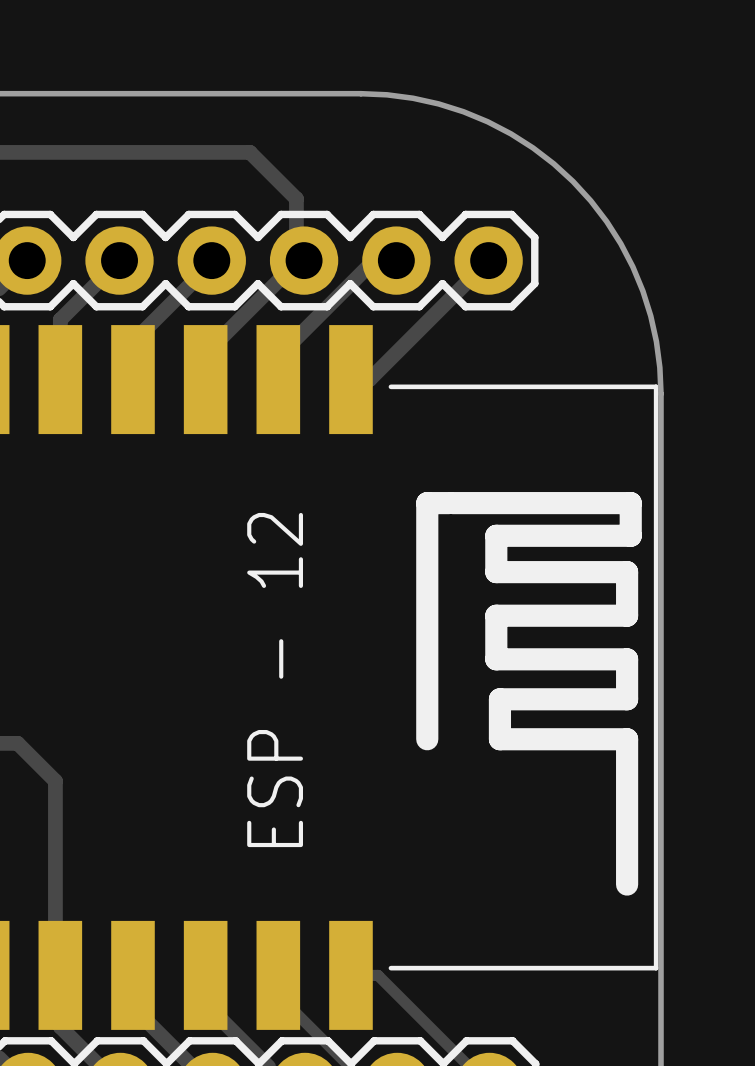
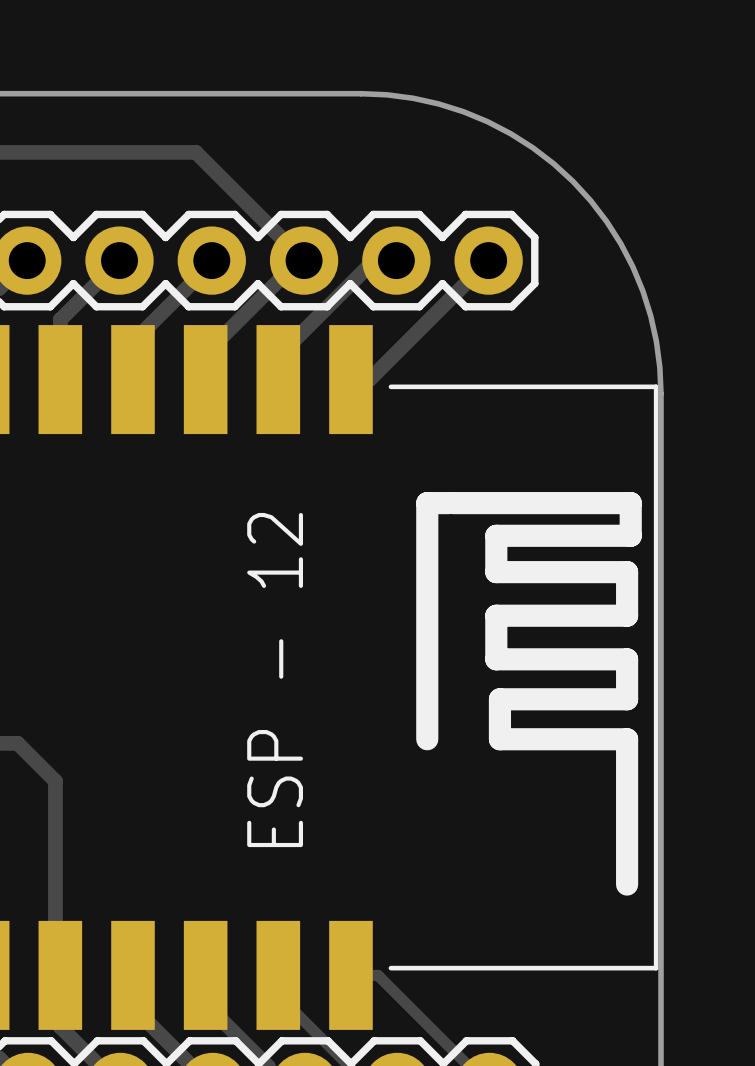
track: (195, 152) (249, 152) (296, 198) (296, 252) -> (195, 152) (296, 252)

